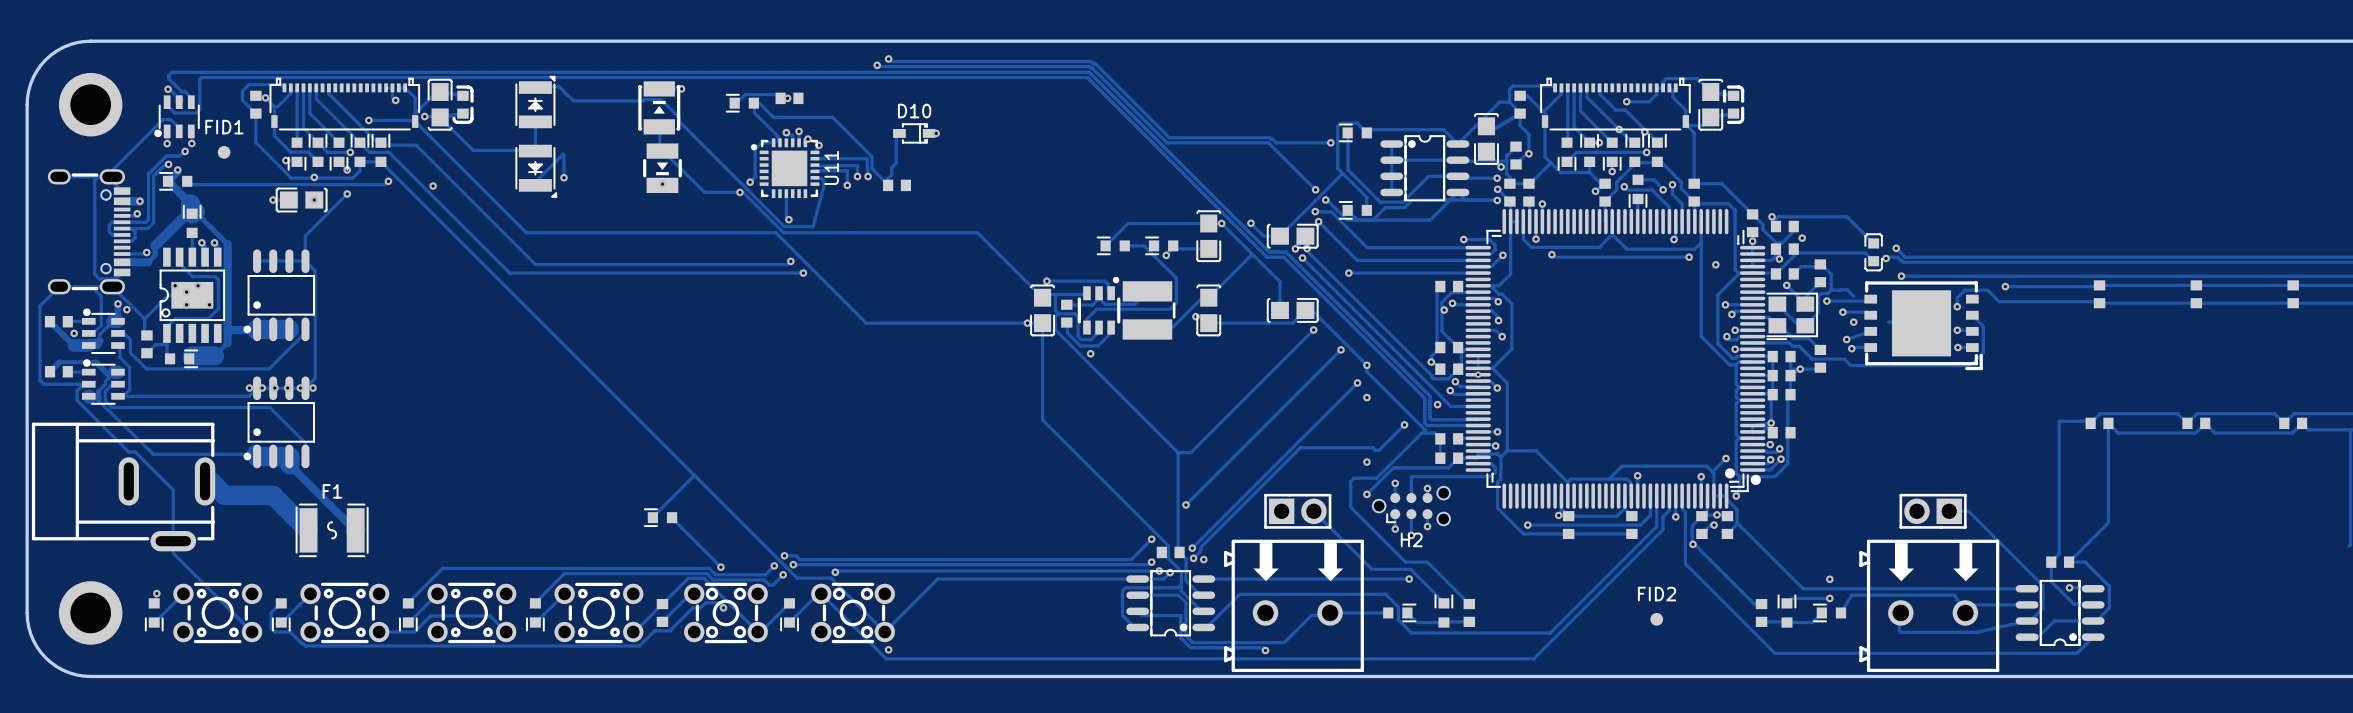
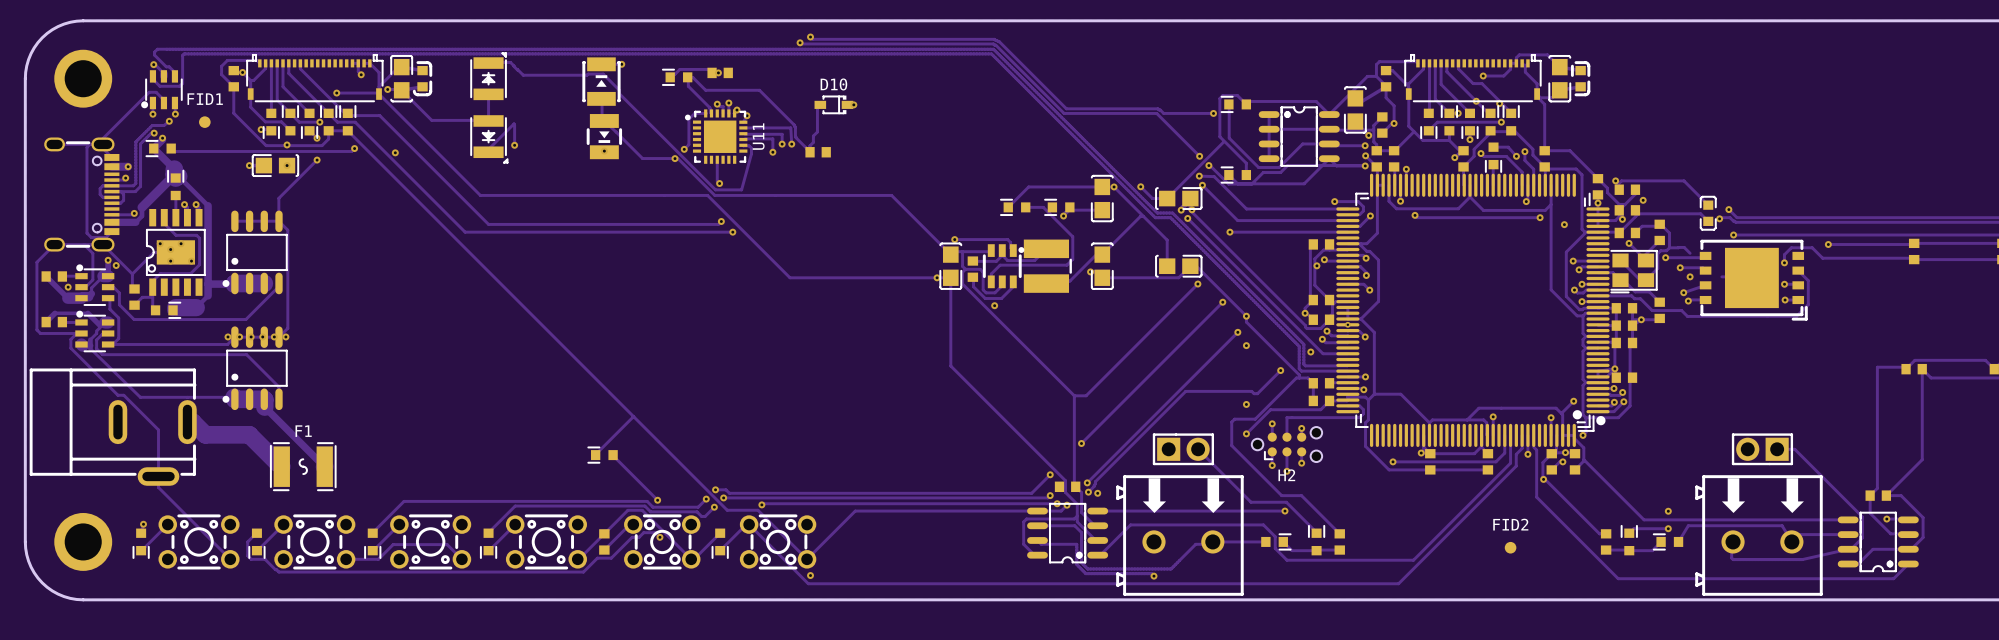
part footprint: [1077, 276, 1121, 335] -> [982, 244, 1025, 289]

